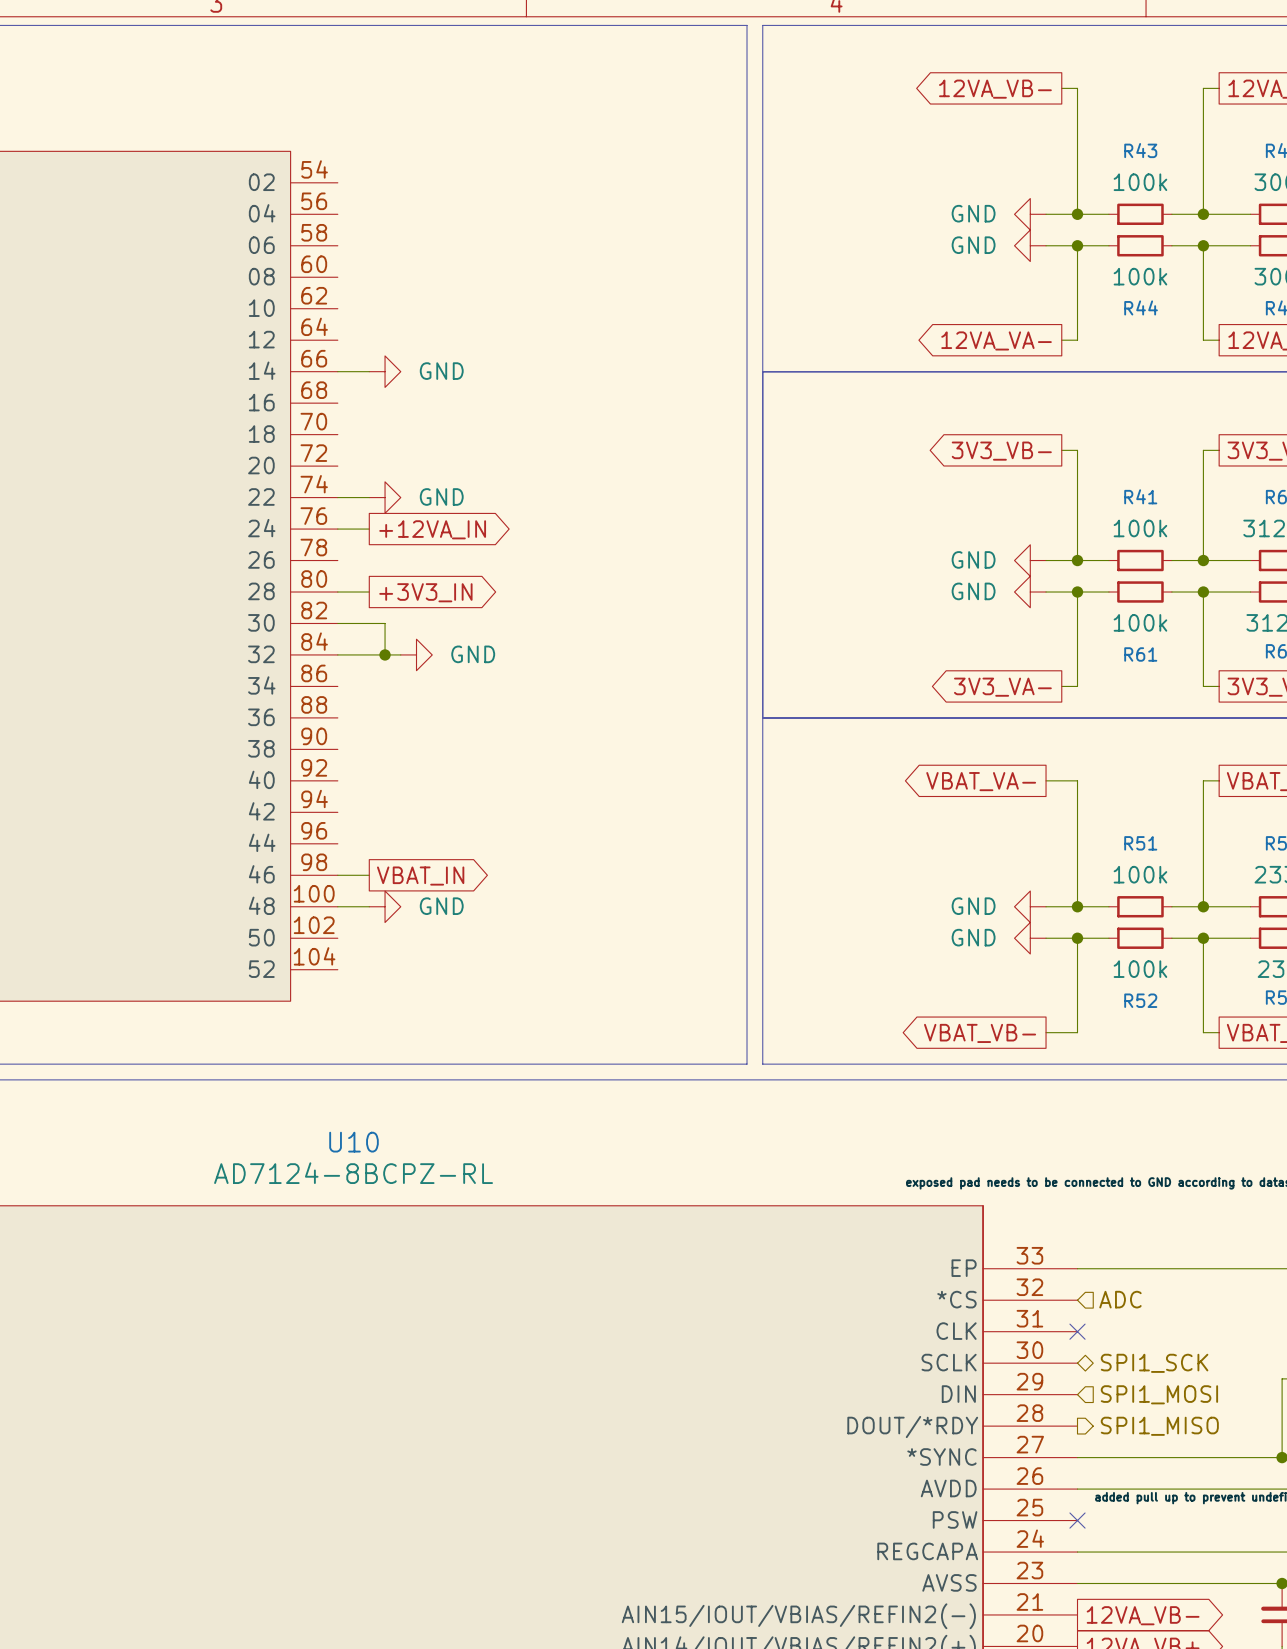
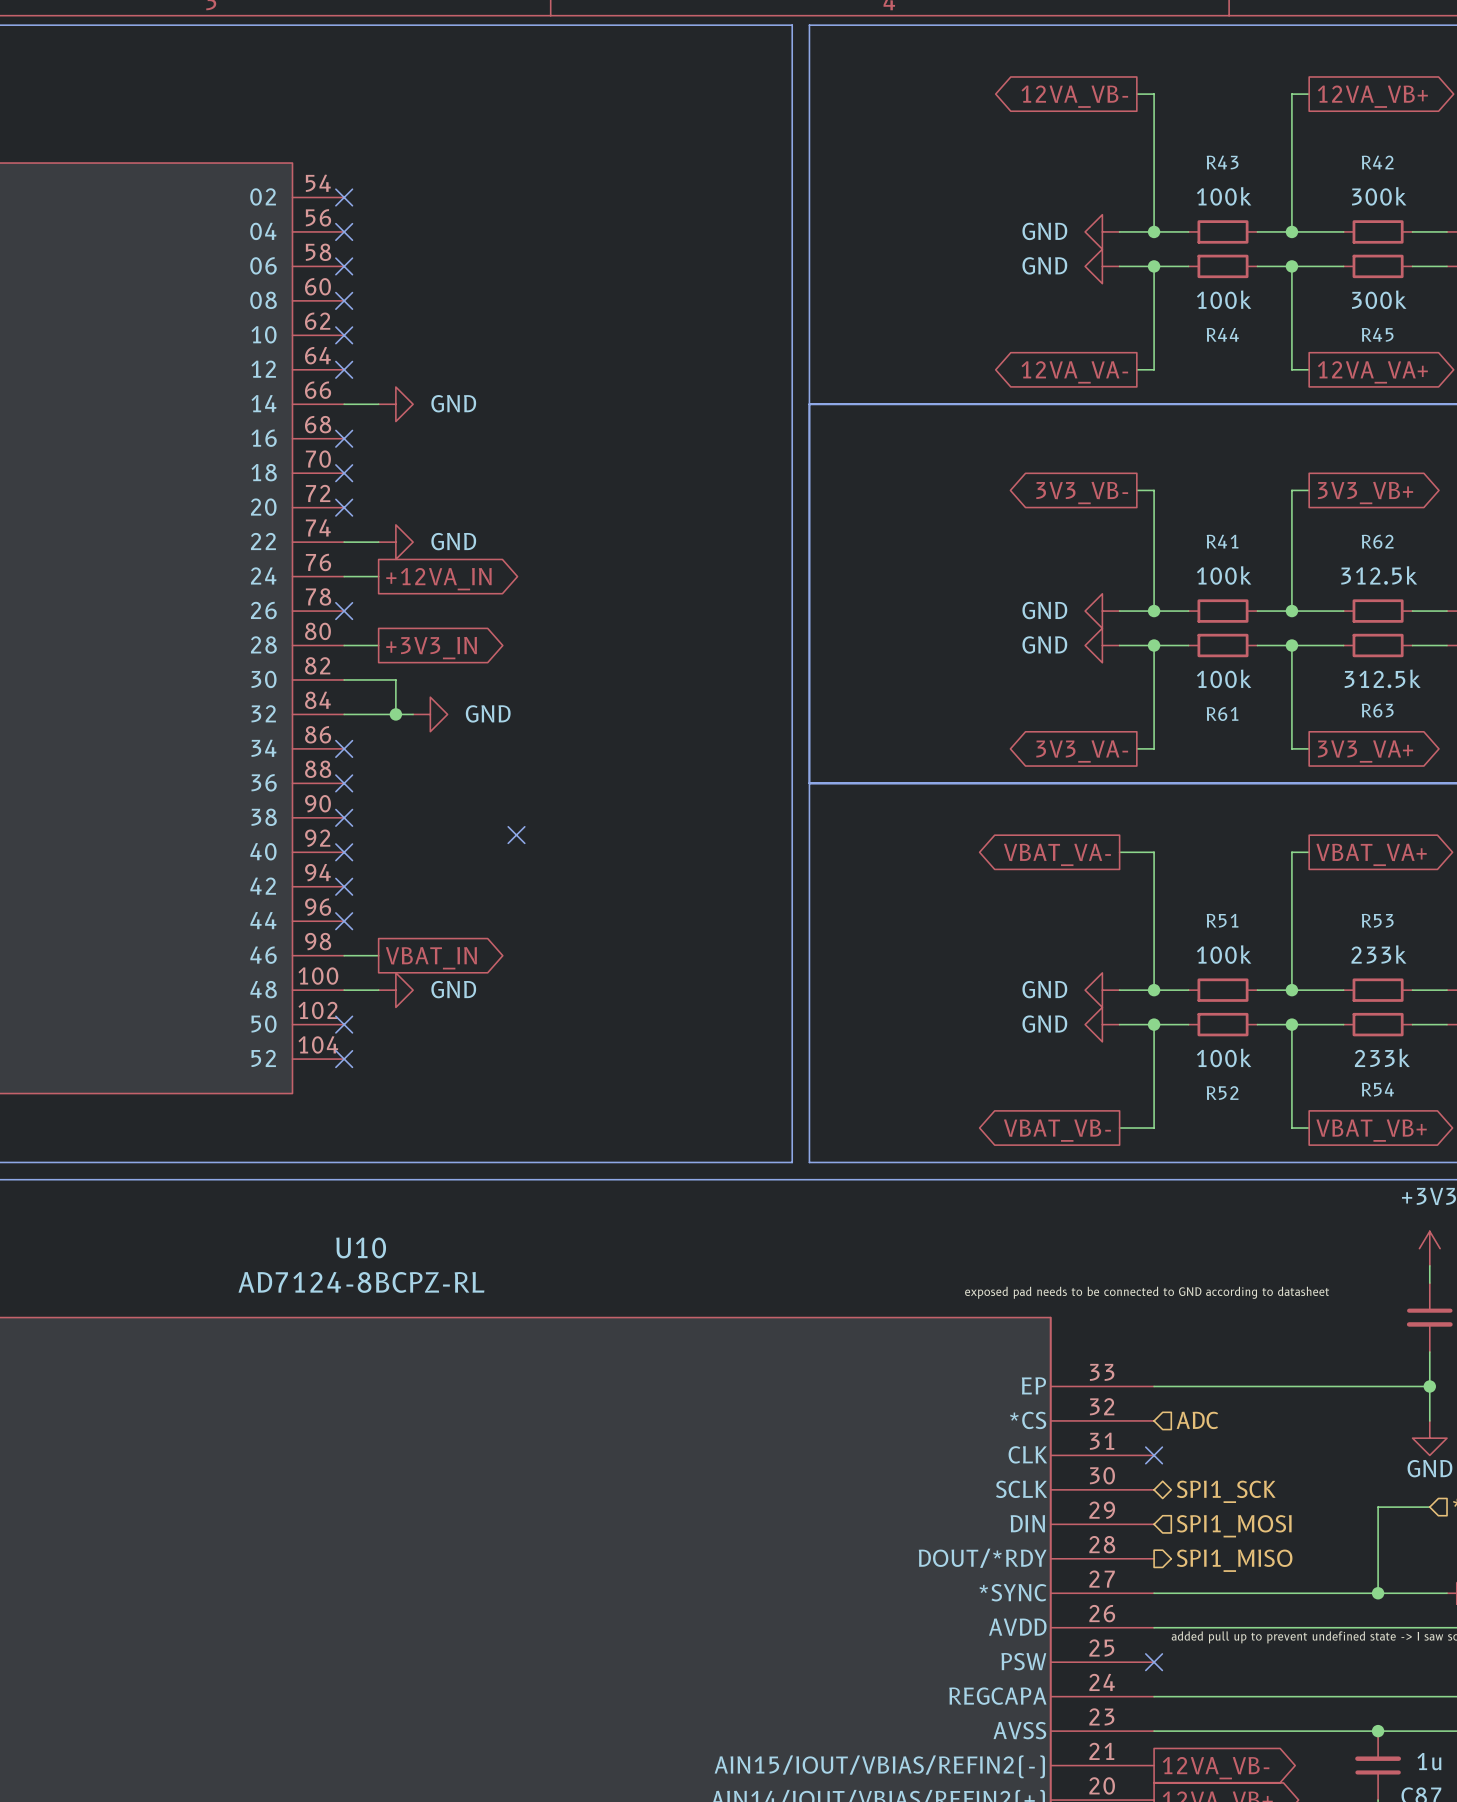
no-connect mark: none -> (344, 197)
no-connect mark: none -> (344, 231)
no-connect mark: none -> (344, 266)
no-connect mark: none -> (344, 300)
no-connect mark: none -> (344, 335)
no-connect mark: none -> (344, 369)
no-connect mark: none -> (344, 438)
no-connect mark: none -> (344, 473)
no-connect mark: none -> (344, 507)
no-connect mark: none -> (344, 611)
no-connect mark: none -> (344, 748)
no-connect mark: none -> (344, 783)
no-connect mark: none -> (344, 817)
no-connect mark: none -> (516, 835)
no-connect mark: none -> (344, 852)
no-connect mark: none -> (344, 886)
no-connect mark: none -> (344, 921)
no-connect mark: none -> (344, 1024)
no-connect mark: none -> (344, 1059)

